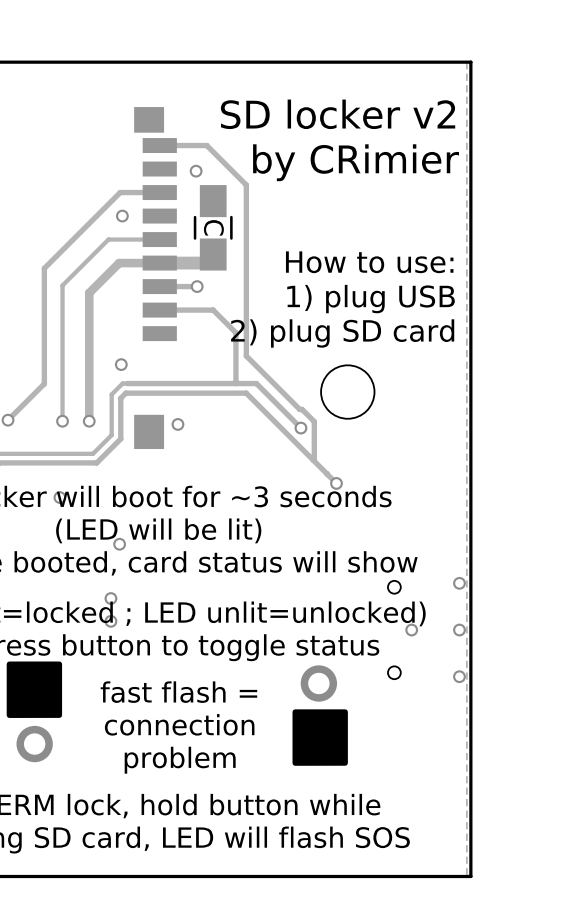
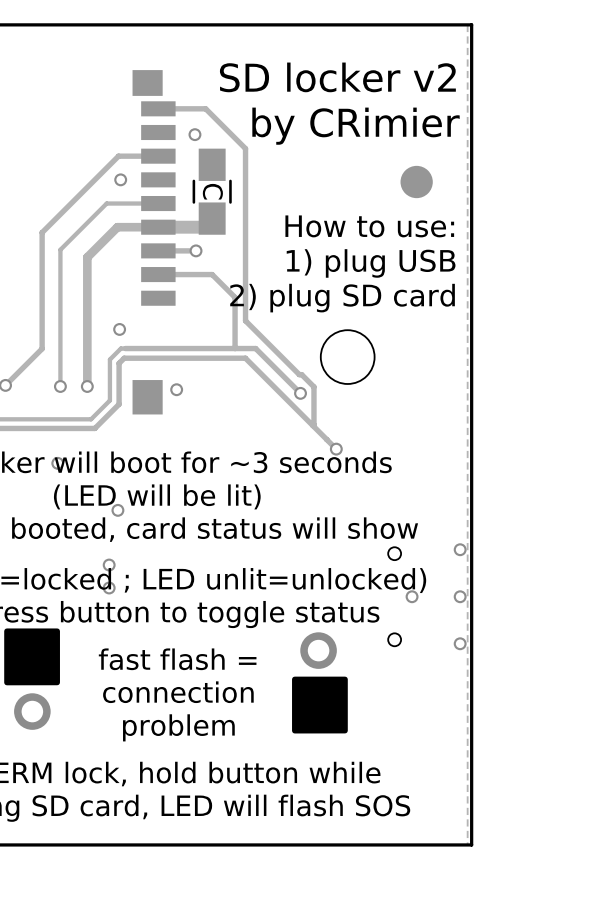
part: none -> (416, 182)

